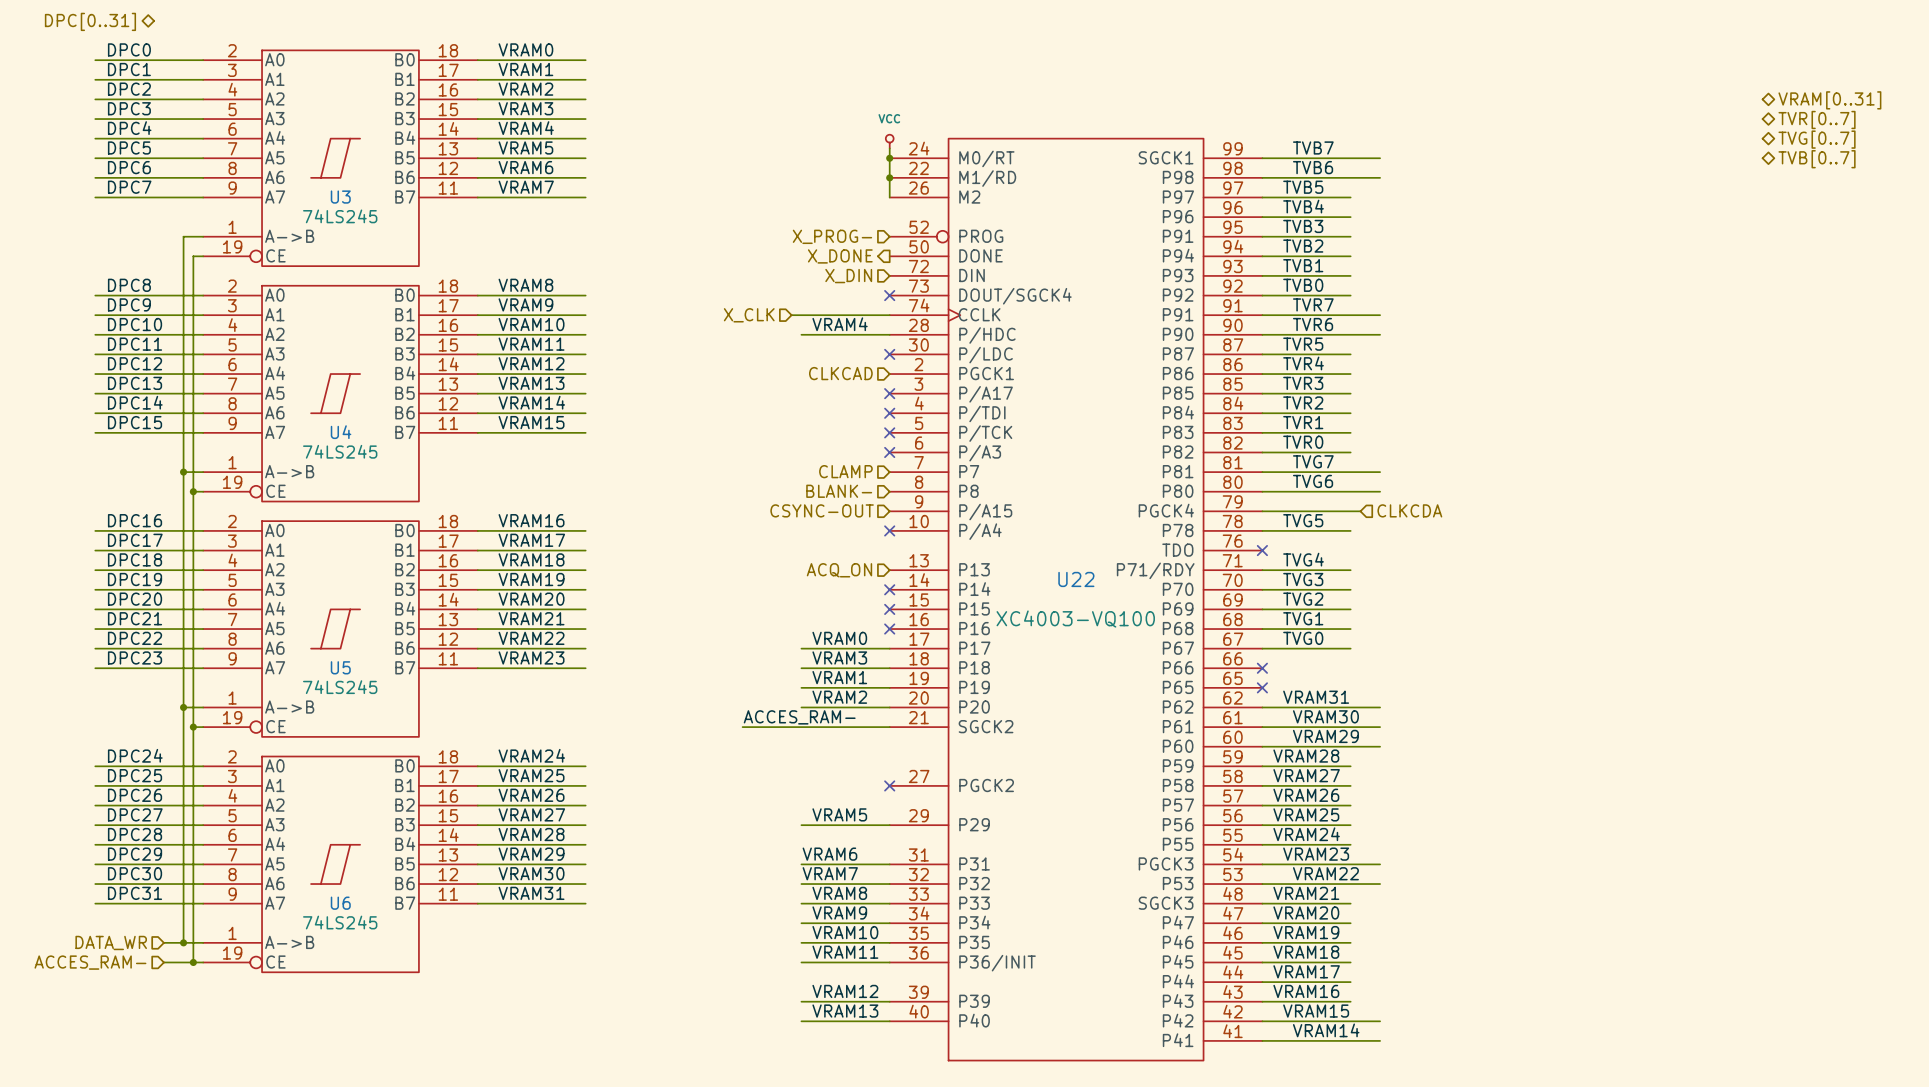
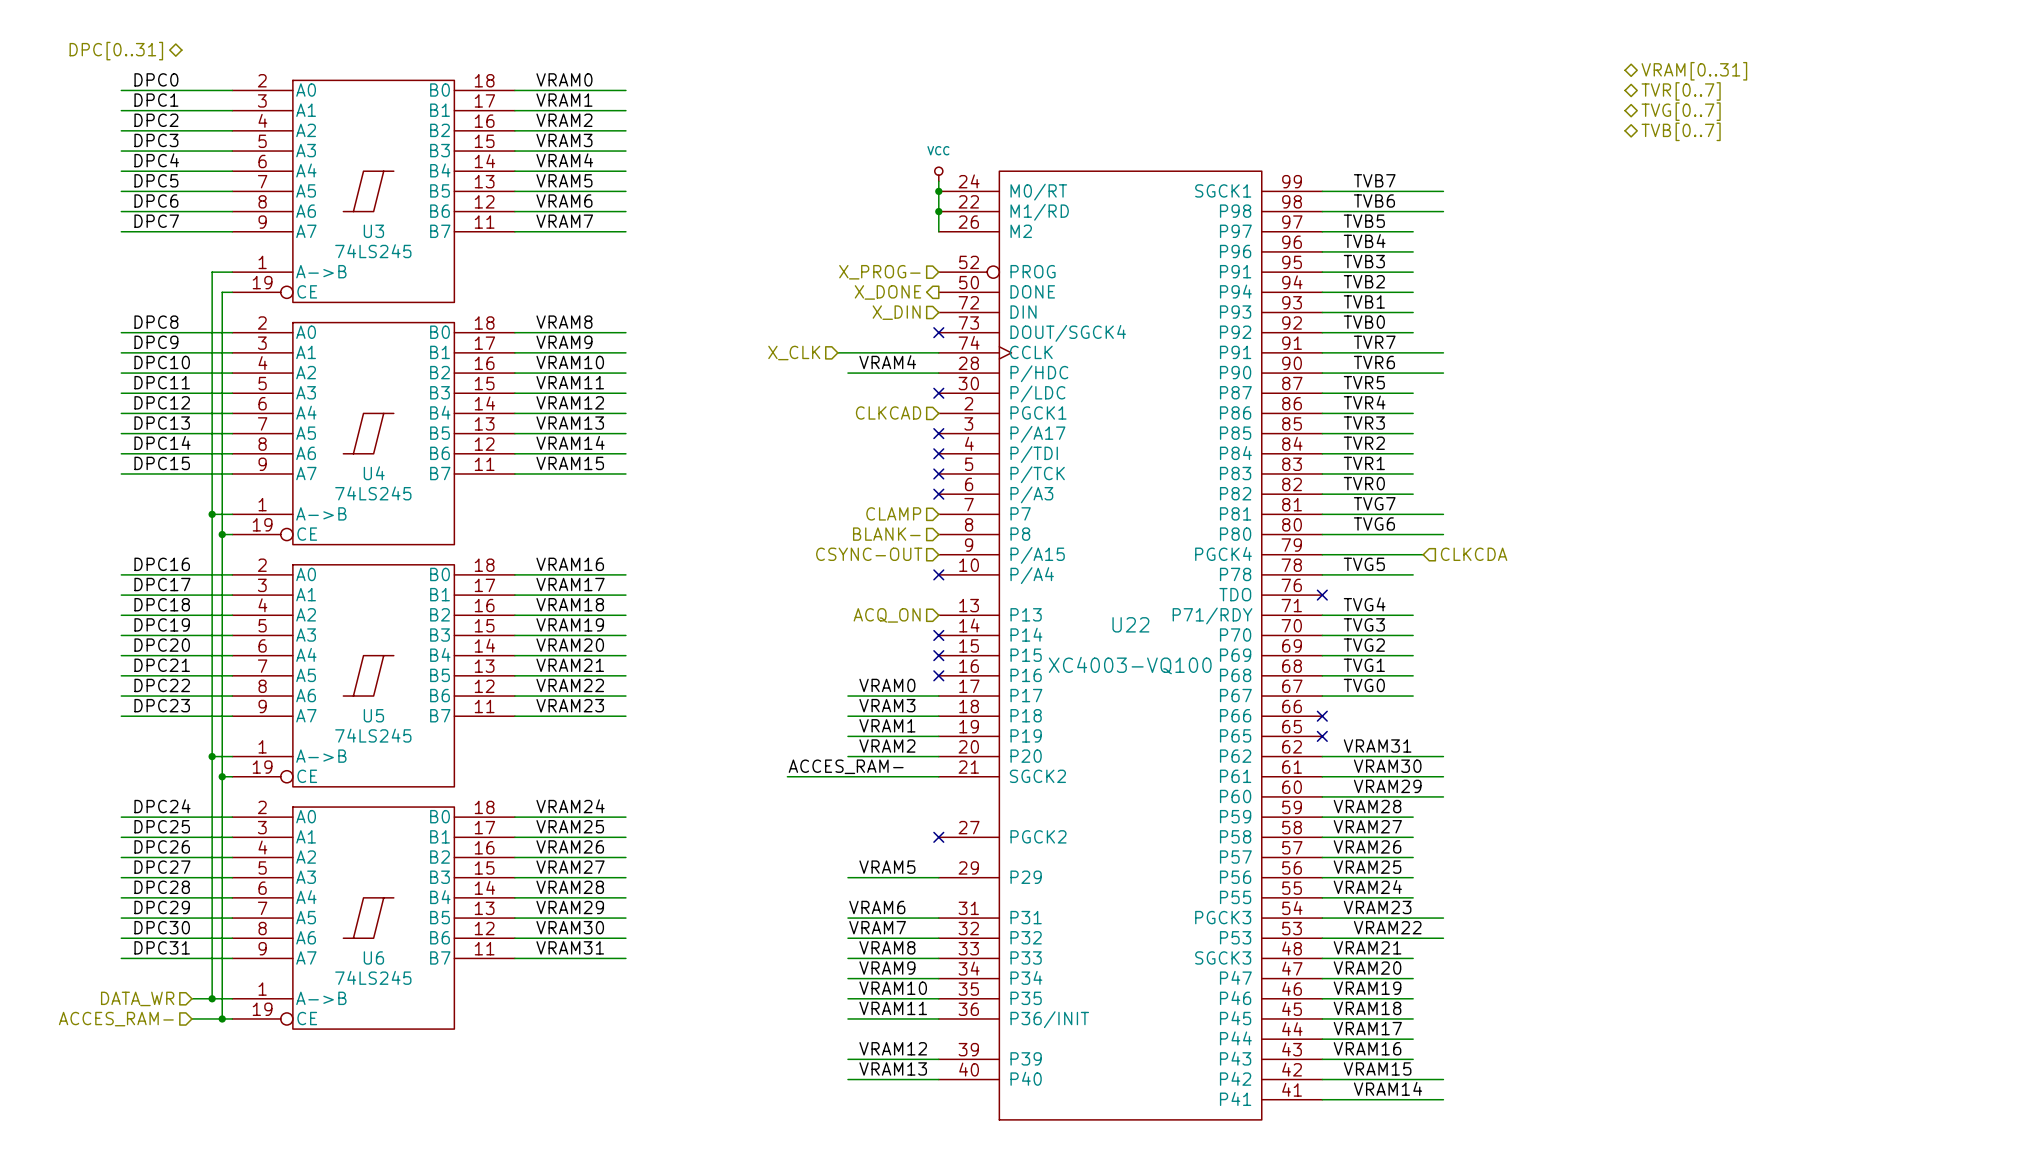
hierarchical label: none -> VRAM[0..31] (1694, 71)
hierarchical label: none -> TVR[0..7] (1681, 91)
hierarchical label: none -> TVG[0..7] (1681, 111)
hierarchical label: none -> TVB[0..7] (1681, 131)
hierarchical label: VRAM[0..31] (1829, 100) -> none
hierarchical label: TVR[0..7] (1817, 119) -> none
hierarchical label: TVG[0..7] (1817, 139) -> none
hierarchical label: TVB[0..7] (1817, 159) -> none

